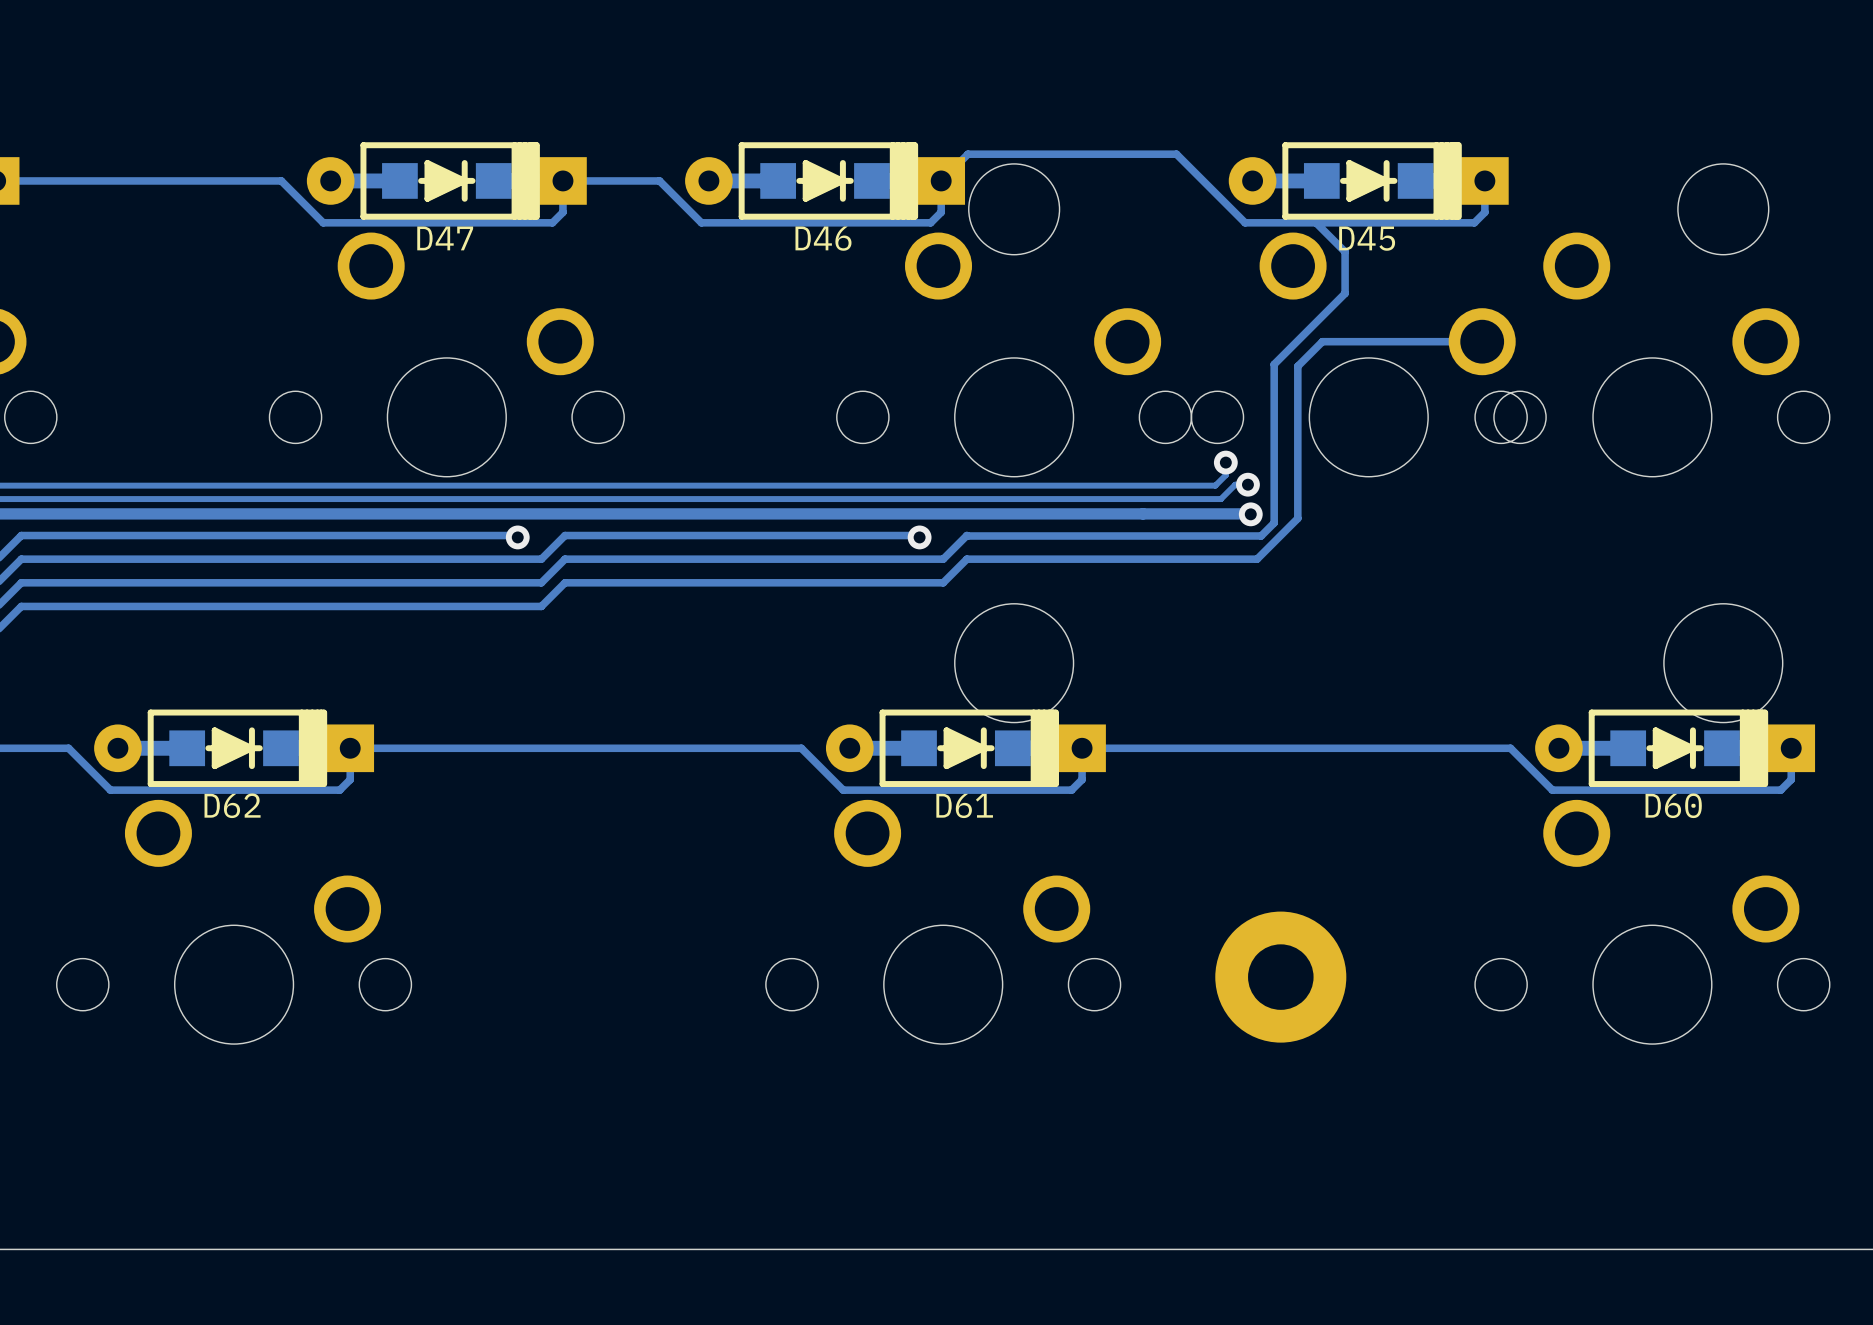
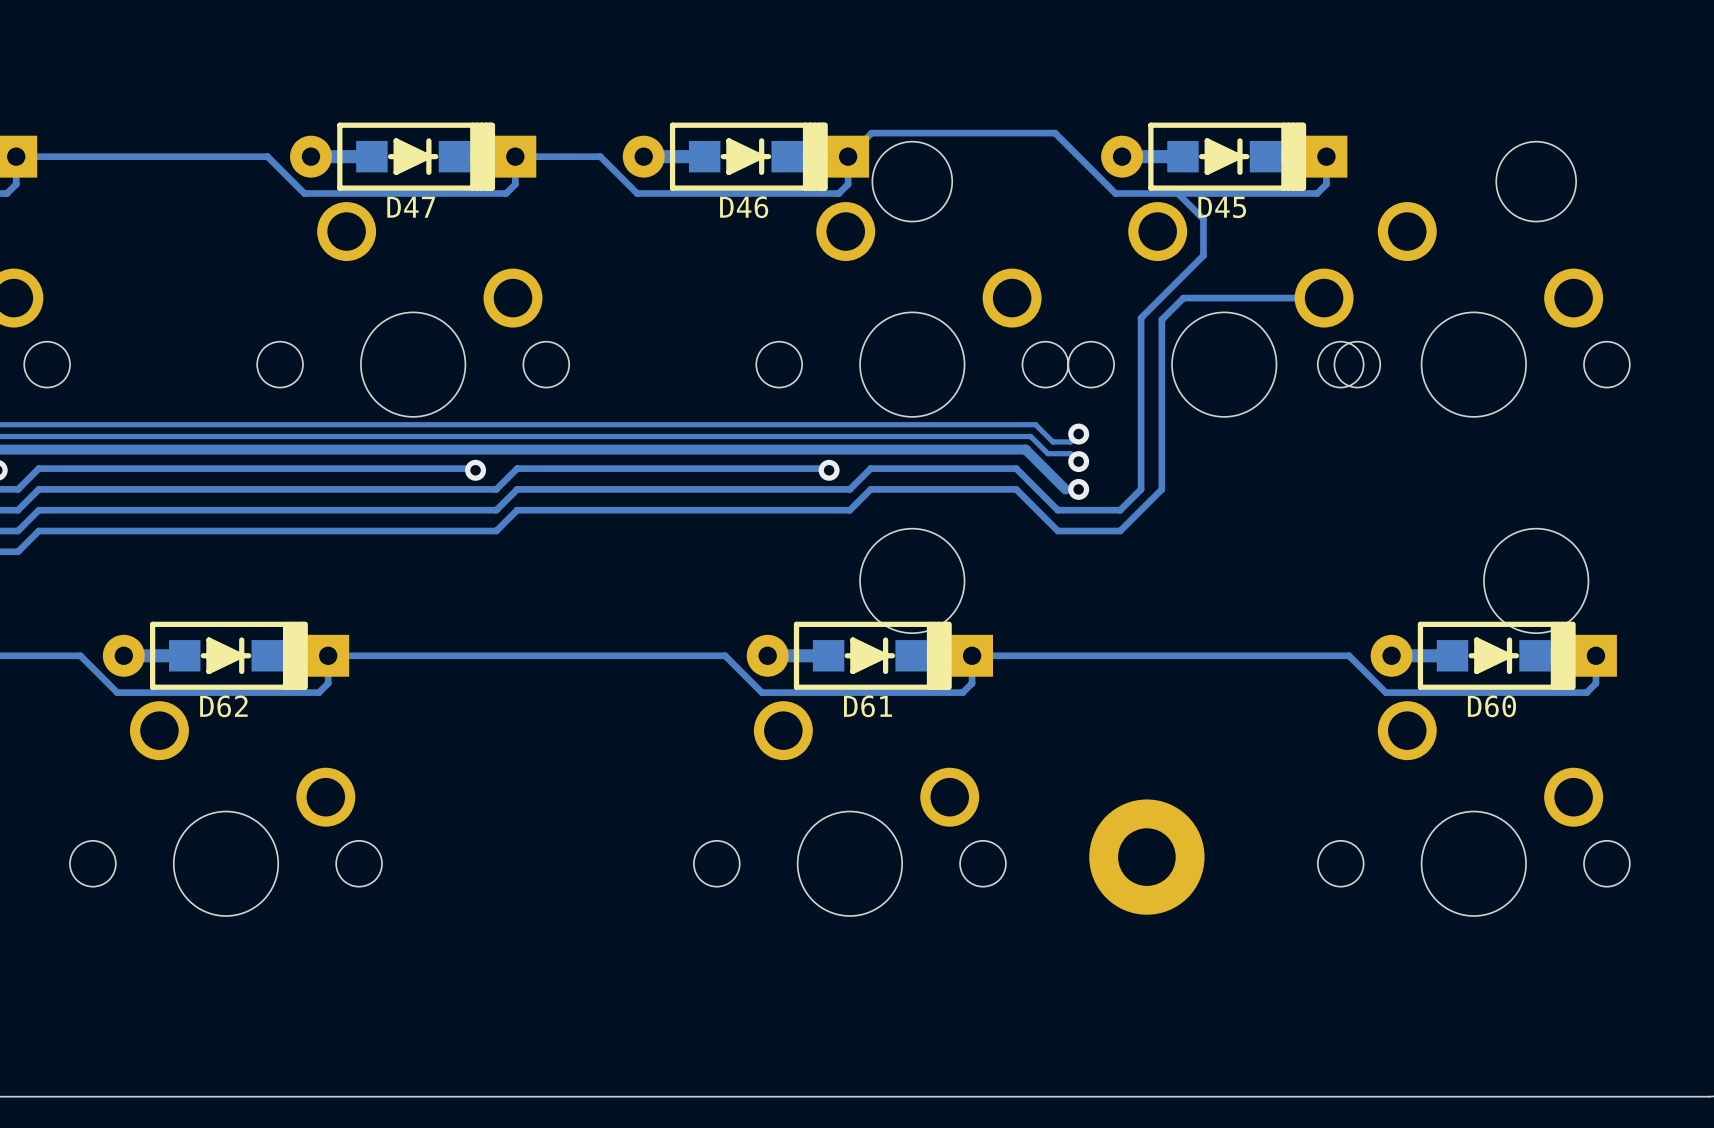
track: (1225, 462) (1225, 475) (1215, 485) (1154, 485) -> (1078, 434) (1070, 441) (1052, 441) (1035, 424)
via: (1225, 462) -> none
track: (1247, 484) (1235, 484) (1220, 499) (1148, 499) -> (1078, 461) (1070, 453) (1047, 453) (1030, 436)
via: (1247, 484) -> none
via: none -> (1078, 434)
track: (1143, 513) (1250, 514) -> none
via: (1250, 514) -> none
track: (1297, 518) (1257, 559) (1203, 559) -> (1161, 453) (1161, 489) (1120, 531) (1057, 531) (1016, 489)
track: (1274, 522) (1261, 535) (966, 535) -> (1141, 457) (1141, 489) (1120, 510) (1057, 510) (1016, 468) (870, 468)
via: none -> (1078, 461)
track: (1188, 559) (1132, 559) -> (1065, 489) (1025, 449)
via: none -> (1078, 489)

